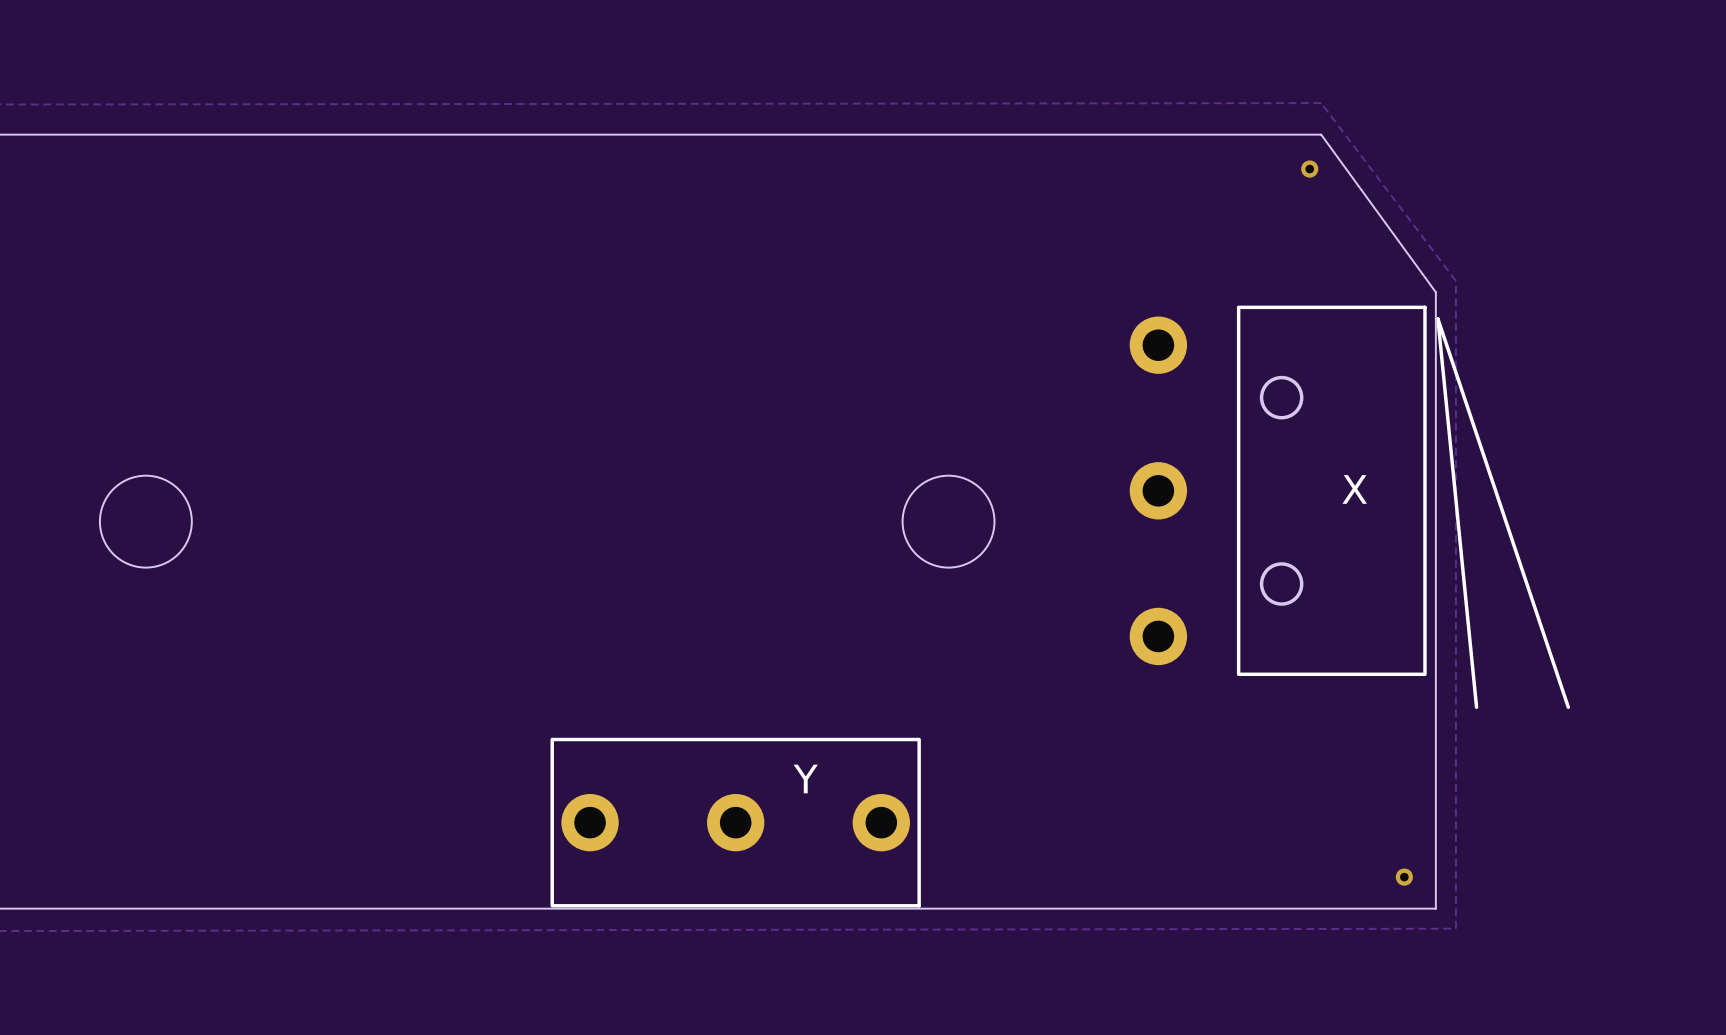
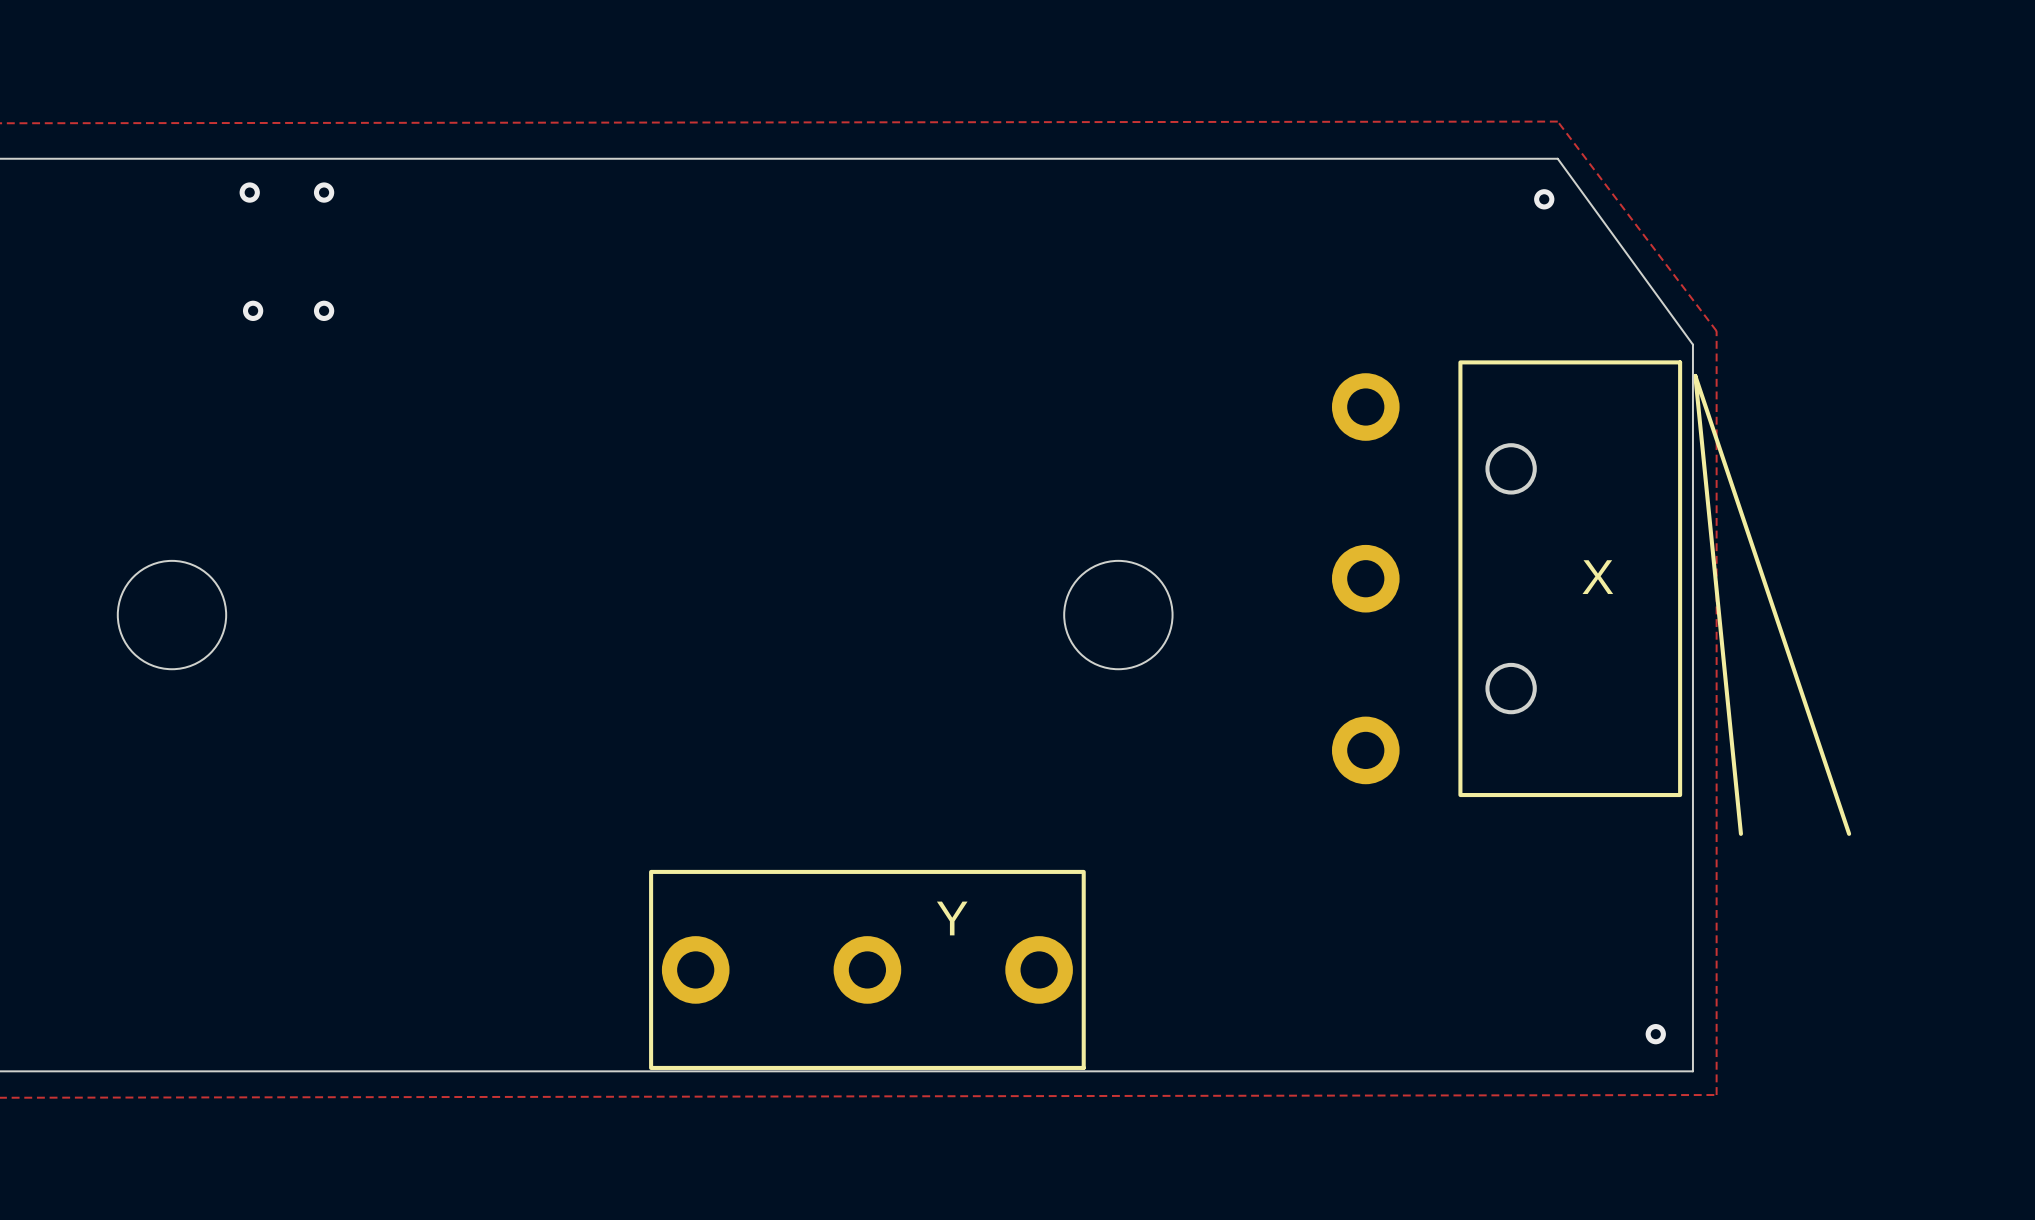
via: none -> (249, 192)
via: none -> (324, 192)
via: none -> (253, 310)
via: none -> (324, 310)

